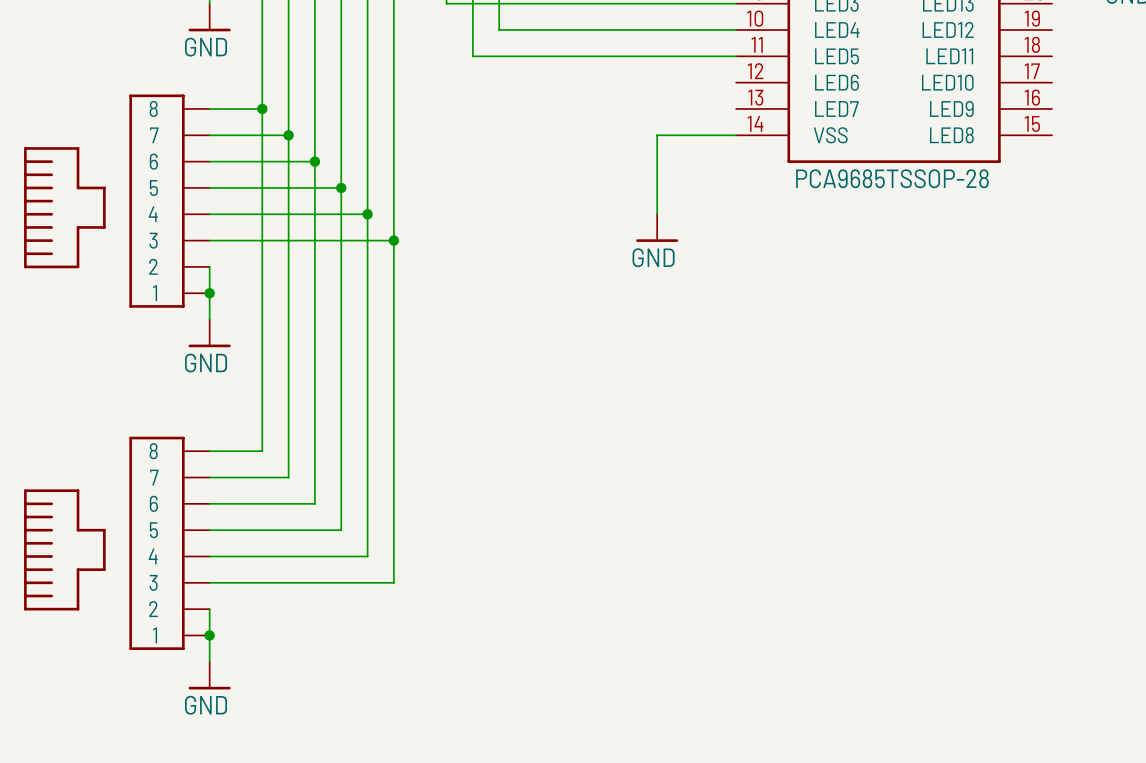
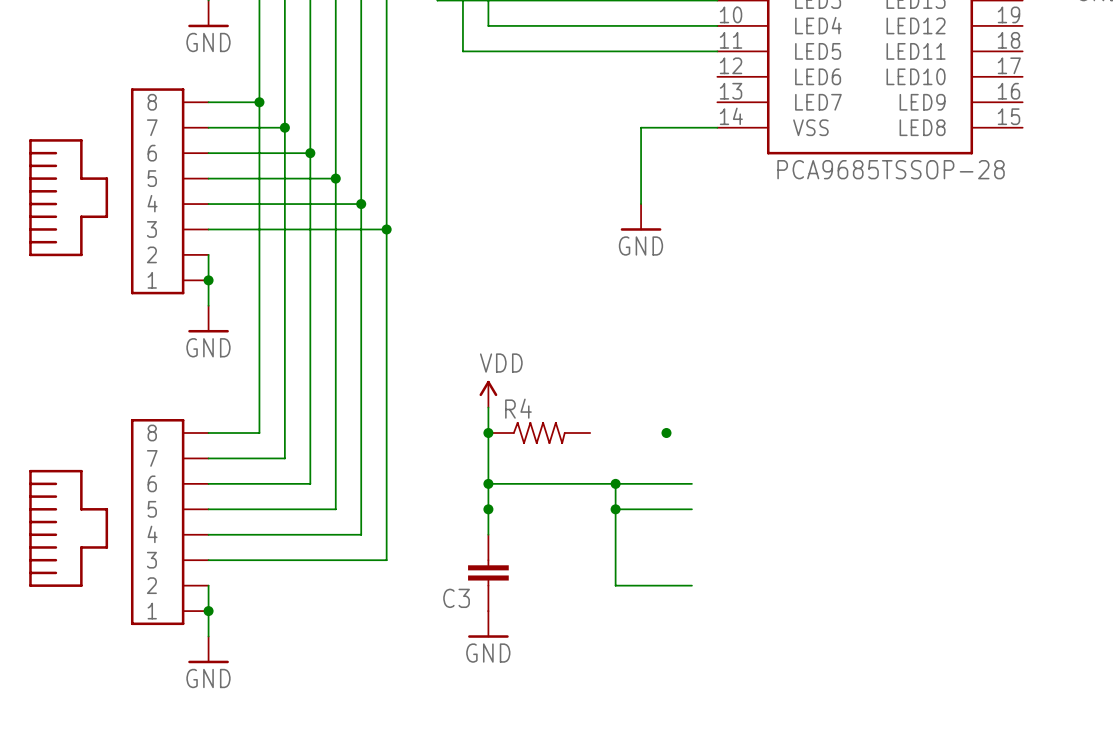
power symbol: none -> VDD (488, 394)
wire: none -> (488, 407) (488, 534)
junction: none -> (488, 433)
R4: none -> (539, 433)
junction: none -> (666, 433)
wire: none -> (488, 483) (691, 483)
junction: none -> (488, 483)
wire: none -> (615, 483) (615, 585) (691, 585)
junction: none -> (615, 483)
junction: none -> (488, 509)
wire: none -> (615, 509) (691, 509)
junction: none -> (615, 509)
C3: none -> (488, 572)
power symbol: none -> GND (488, 624)

